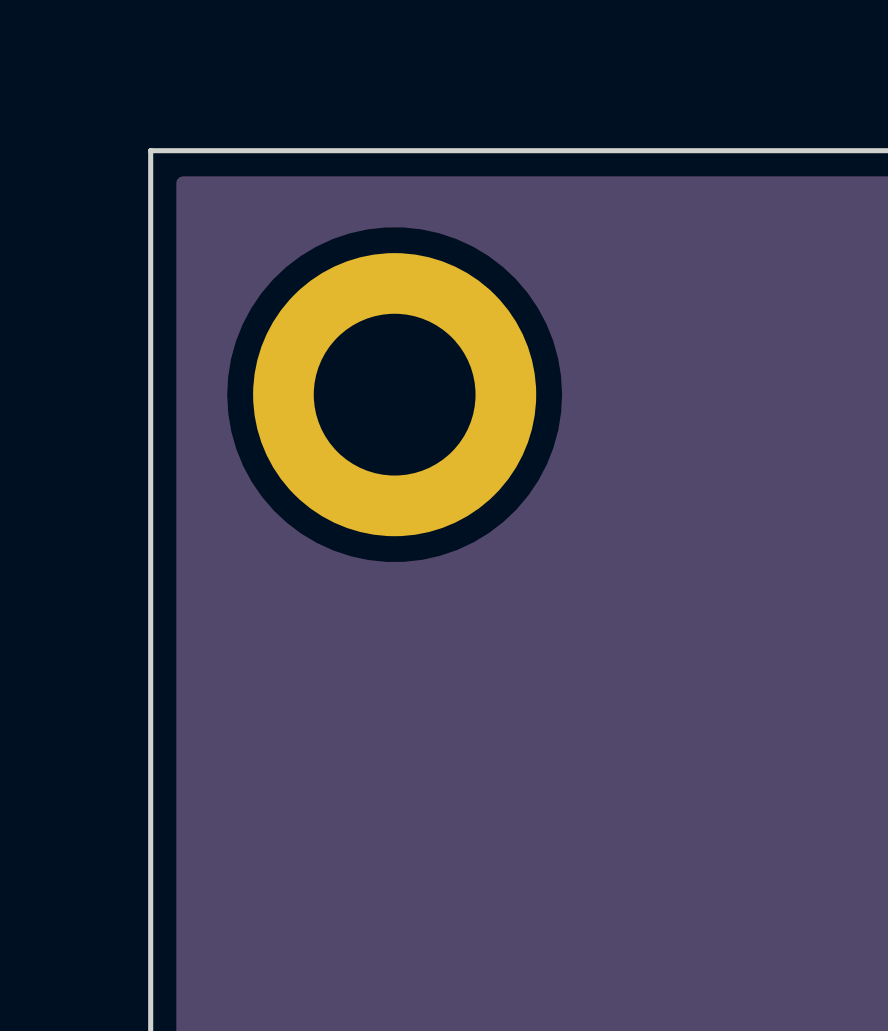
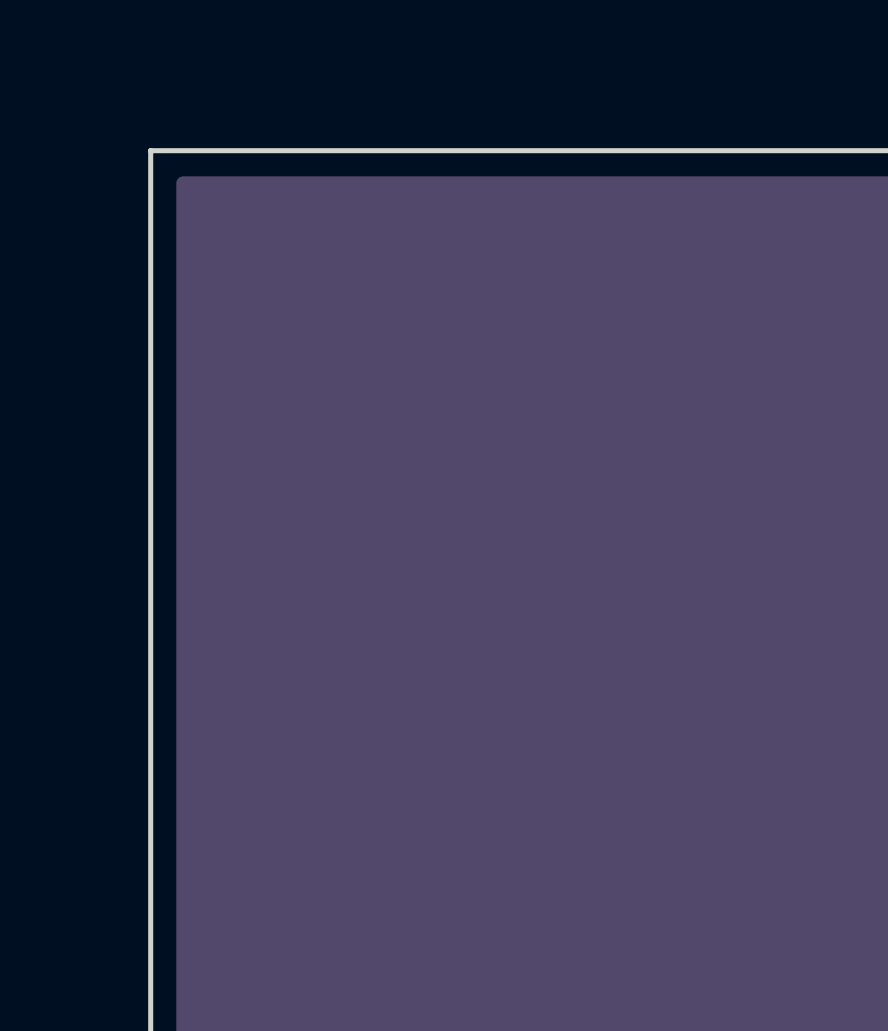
part: (394, 394) -> none

